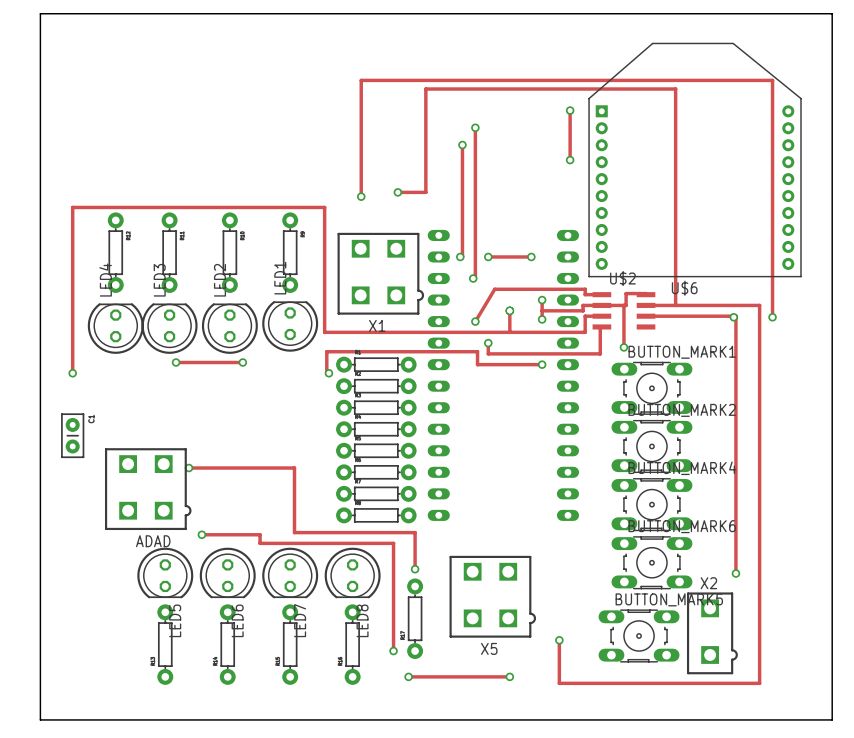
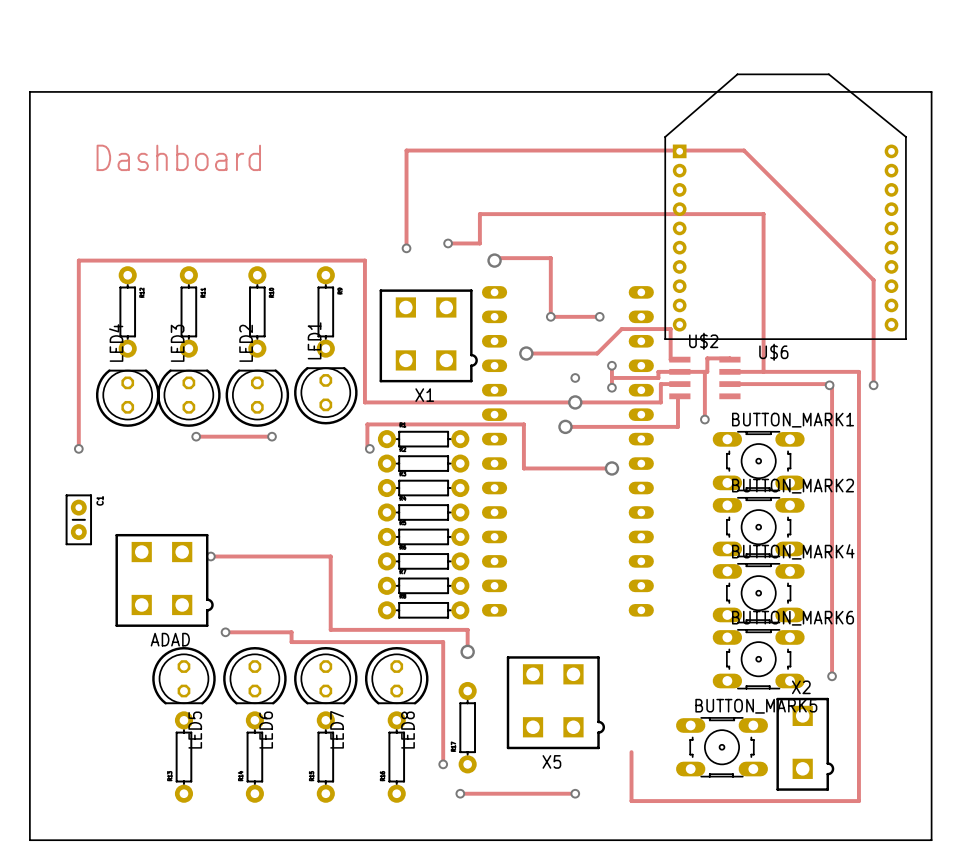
board edge: (40, 13) (832, 13) (832, 719) (40, 719) (40, 13) -> (29, 91) (29, 840) (931, 840) (931, 91) (29, 91)
track: (361, 110) (361, 80) (772, 80) (772, 224) -> (406, 150) (744, 150) (873, 280)
track: (570, 110) (570, 160) -> none
via: (570, 110) -> none
text: none -> Dashboard (178, 157)
track: (475, 127) (475, 278) (473, 278) -> none
via: (475, 127) -> none
track: (462, 145) (462, 256) (460, 256) -> none
via: (462, 145) -> none
via: (570, 160) -> none
track: (425, 166) (425, 89) (675, 89) (675, 166) -> (479, 214) (763, 214)
track: none -> (494, 260) (494, 258) (550, 258) (550, 316)
via: none -> (494, 260)
via: (460, 256) -> none
via: (473, 278) -> none
via: none -> (526, 353)
track: (494, 289) (475, 321) -> (558, 353) (526, 353)
track: (529, 289) (585, 289) (585, 294) (593, 294) -> (597, 353) (621, 329) (670, 329) (670, 359)
track: (509, 310) (509, 332) -> none
via: (475, 321) -> none
via: none -> (575, 402)
track: (488, 343) (488, 353) (501, 353) -> none
via: (488, 343) -> none
track: (464, 351) (477, 351) (477, 364) (542, 364) -> (523, 424) (523, 468) (611, 468)
via: none -> (565, 426)
via: (542, 364) -> none
BUTTON_MARK1 position: (651, 388) -> (758, 461)
via: none -> (611, 468)
BUTTON_MARK2 position: (651, 446) -> (758, 527)
BUTTON_MARK4 position: (651, 504) -> (758, 593)
track: (415, 551) (415, 569) -> none
via: none -> (467, 651)
BUTTON_MARK6 position: (651, 562) -> (758, 659)
via: (415, 569) -> none
via: (559, 640) -> none

